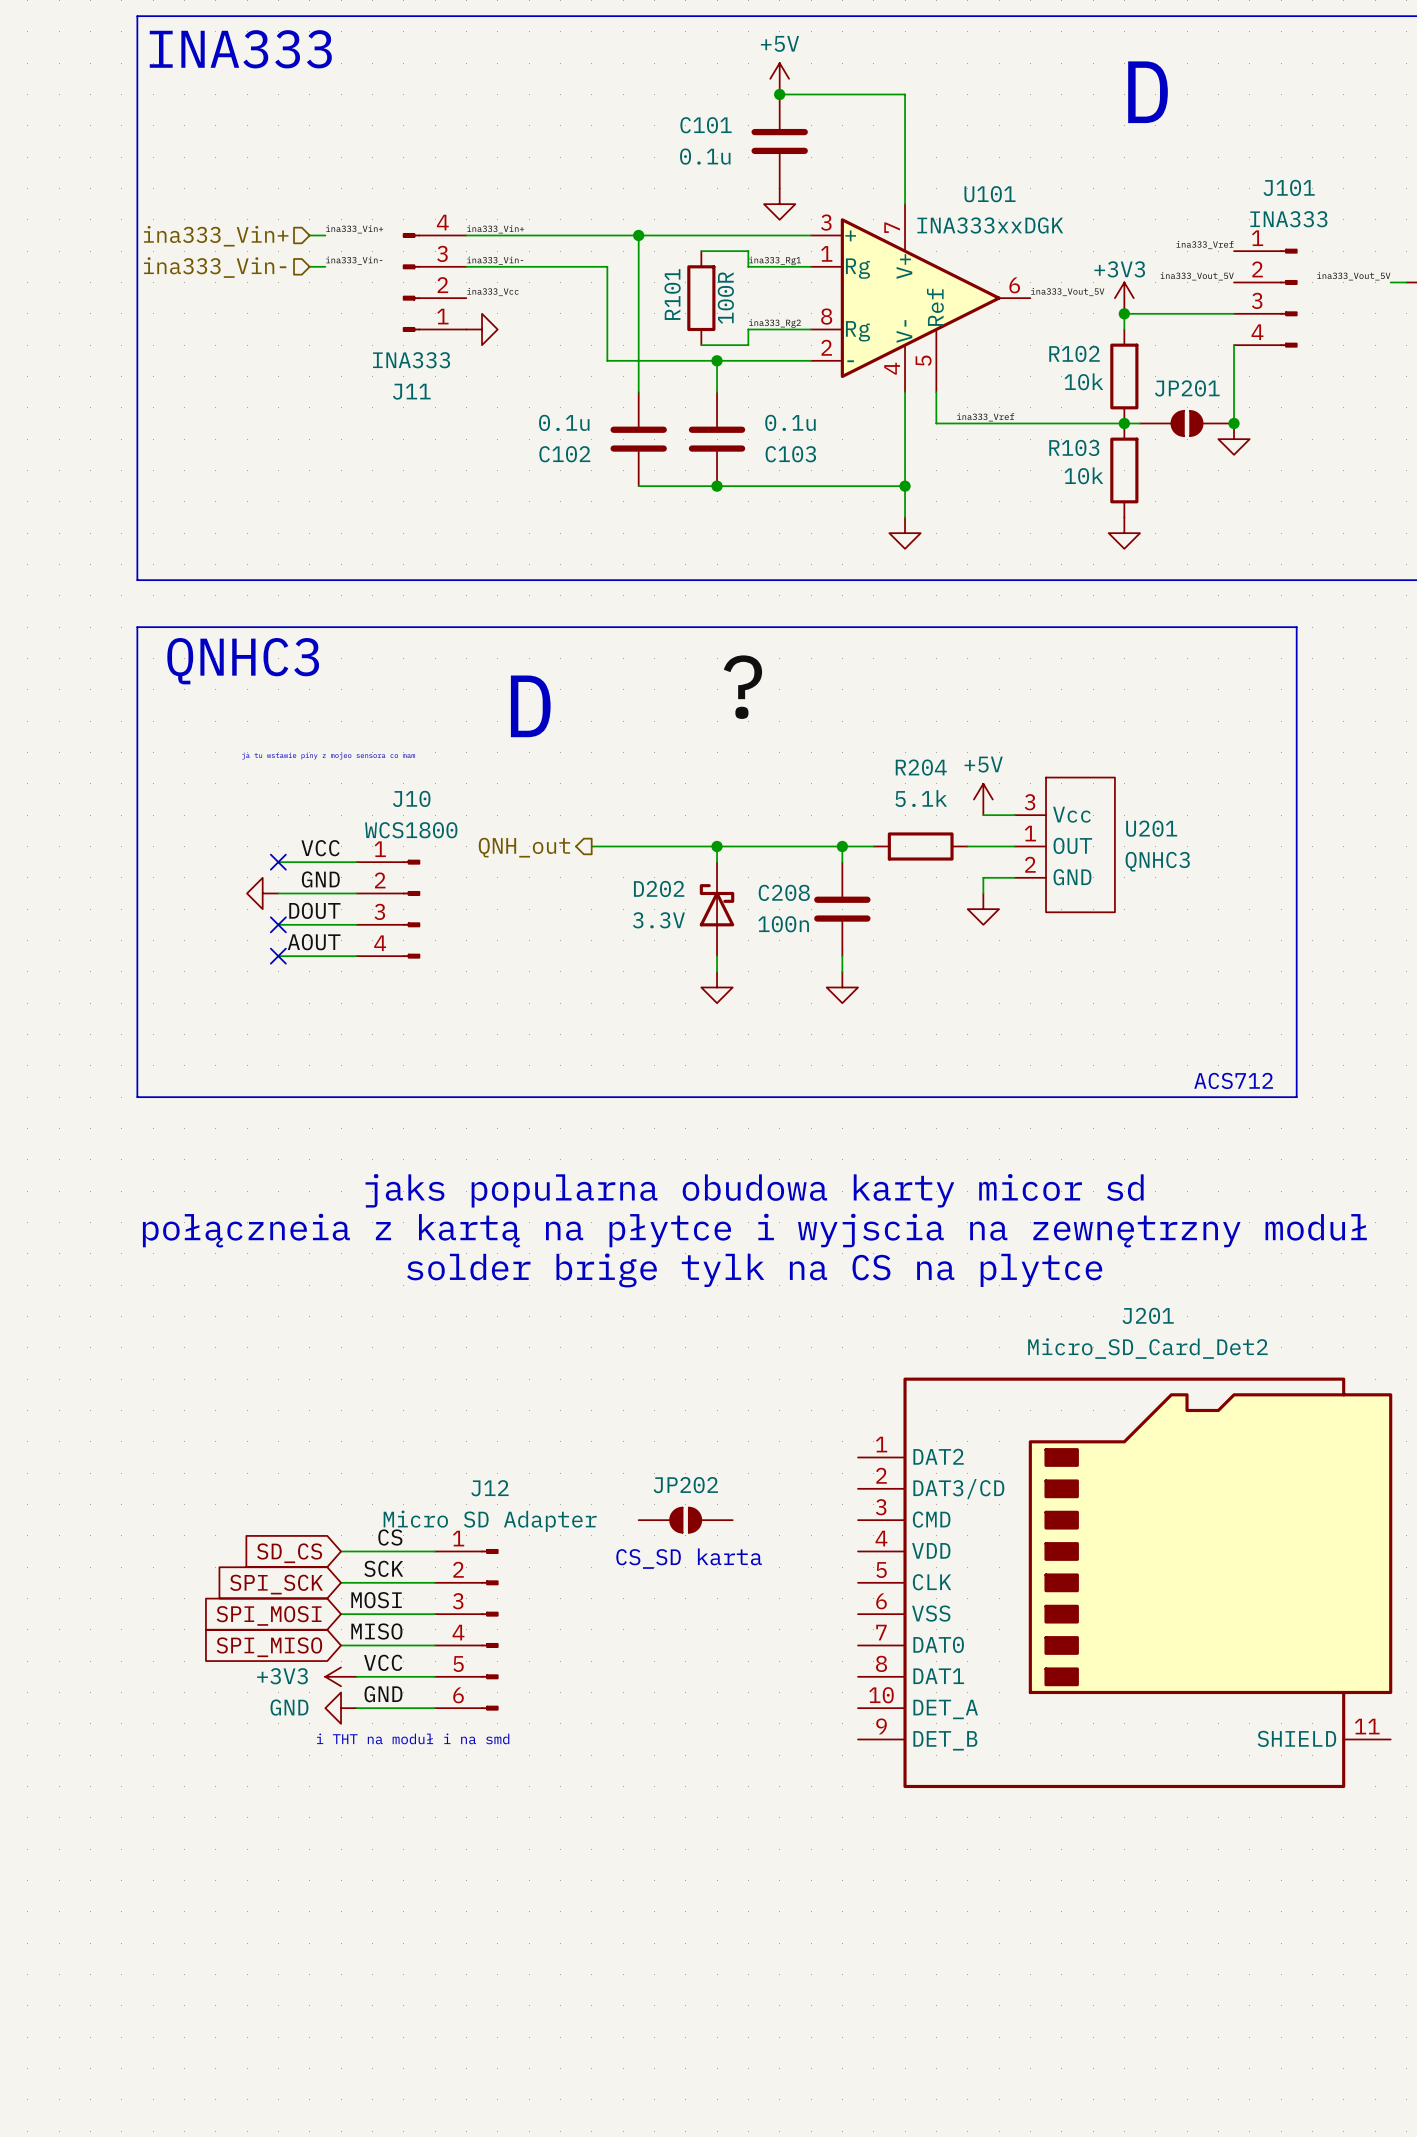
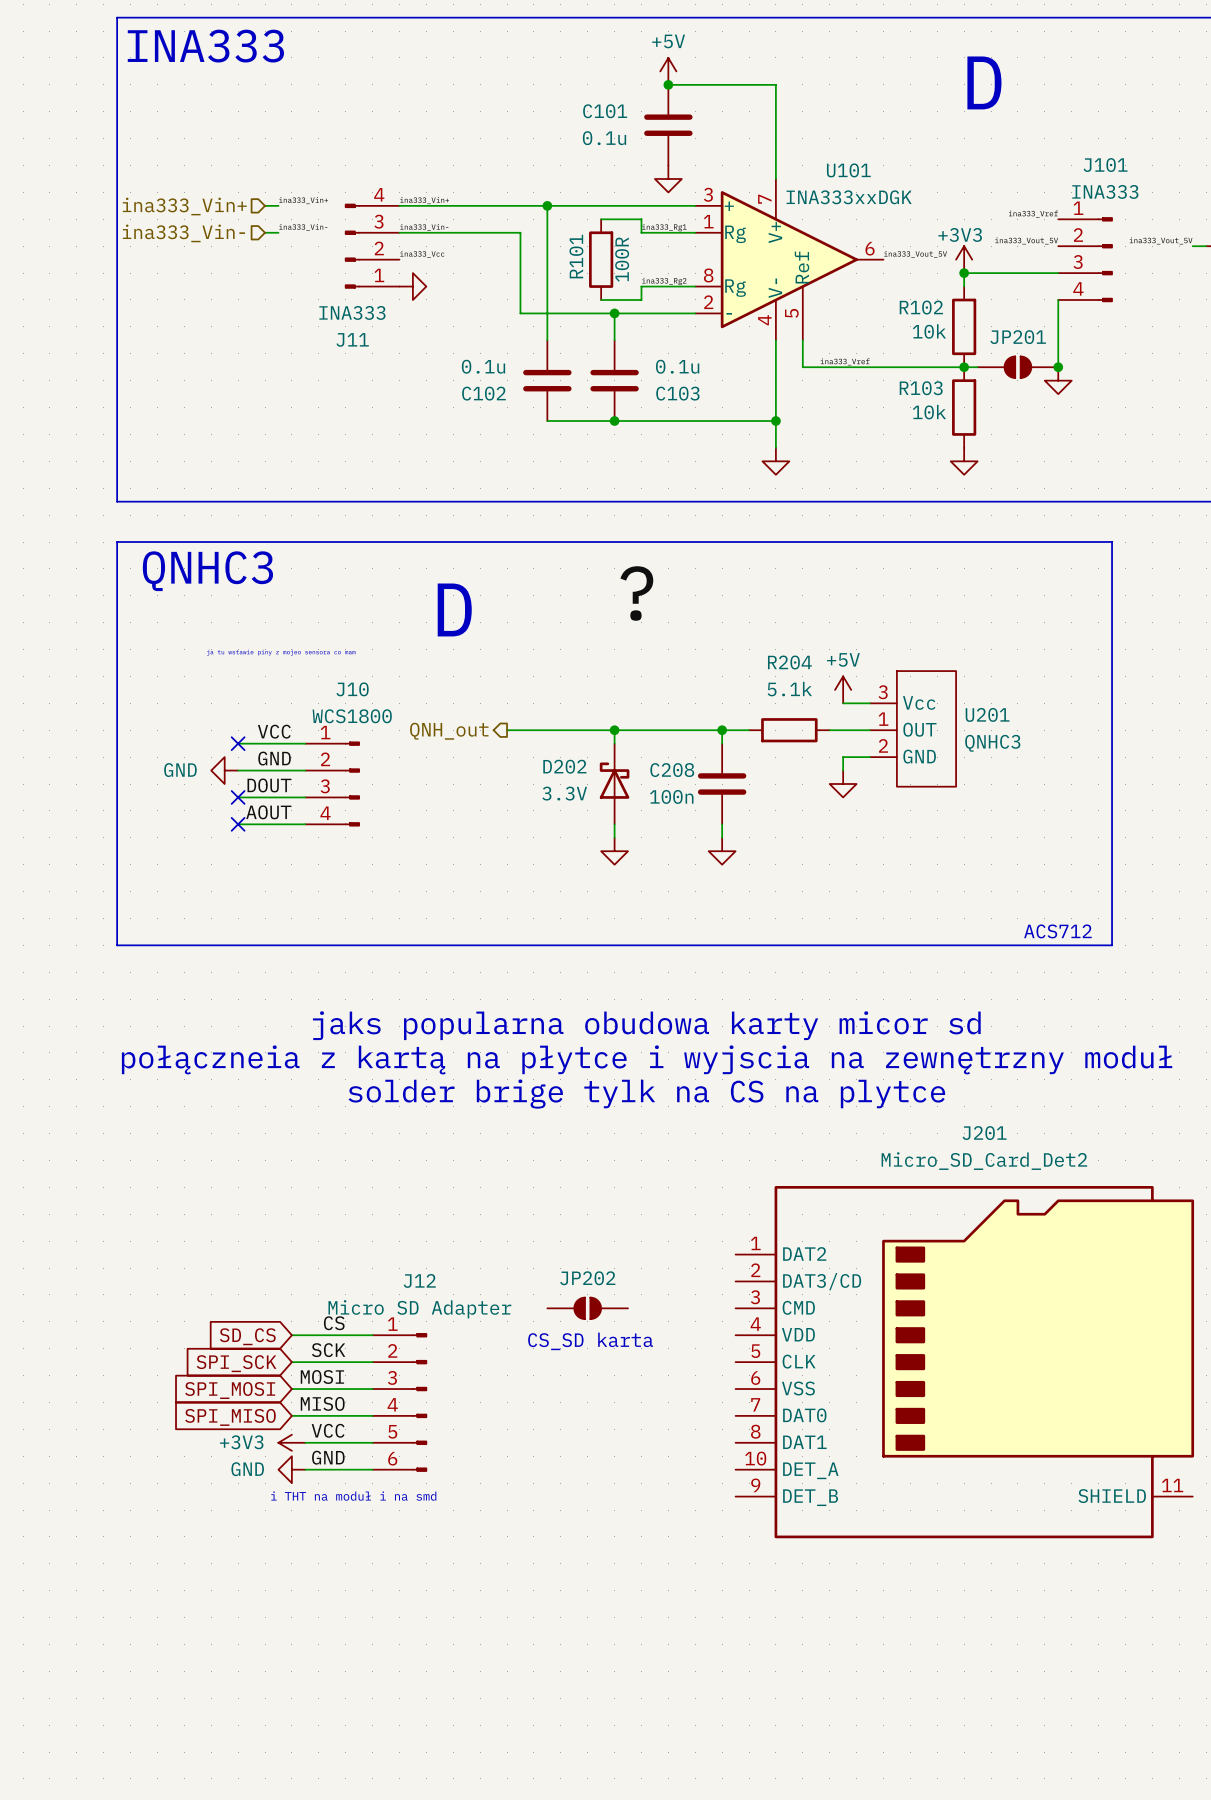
power symbol text: none -> GND (180, 770)

